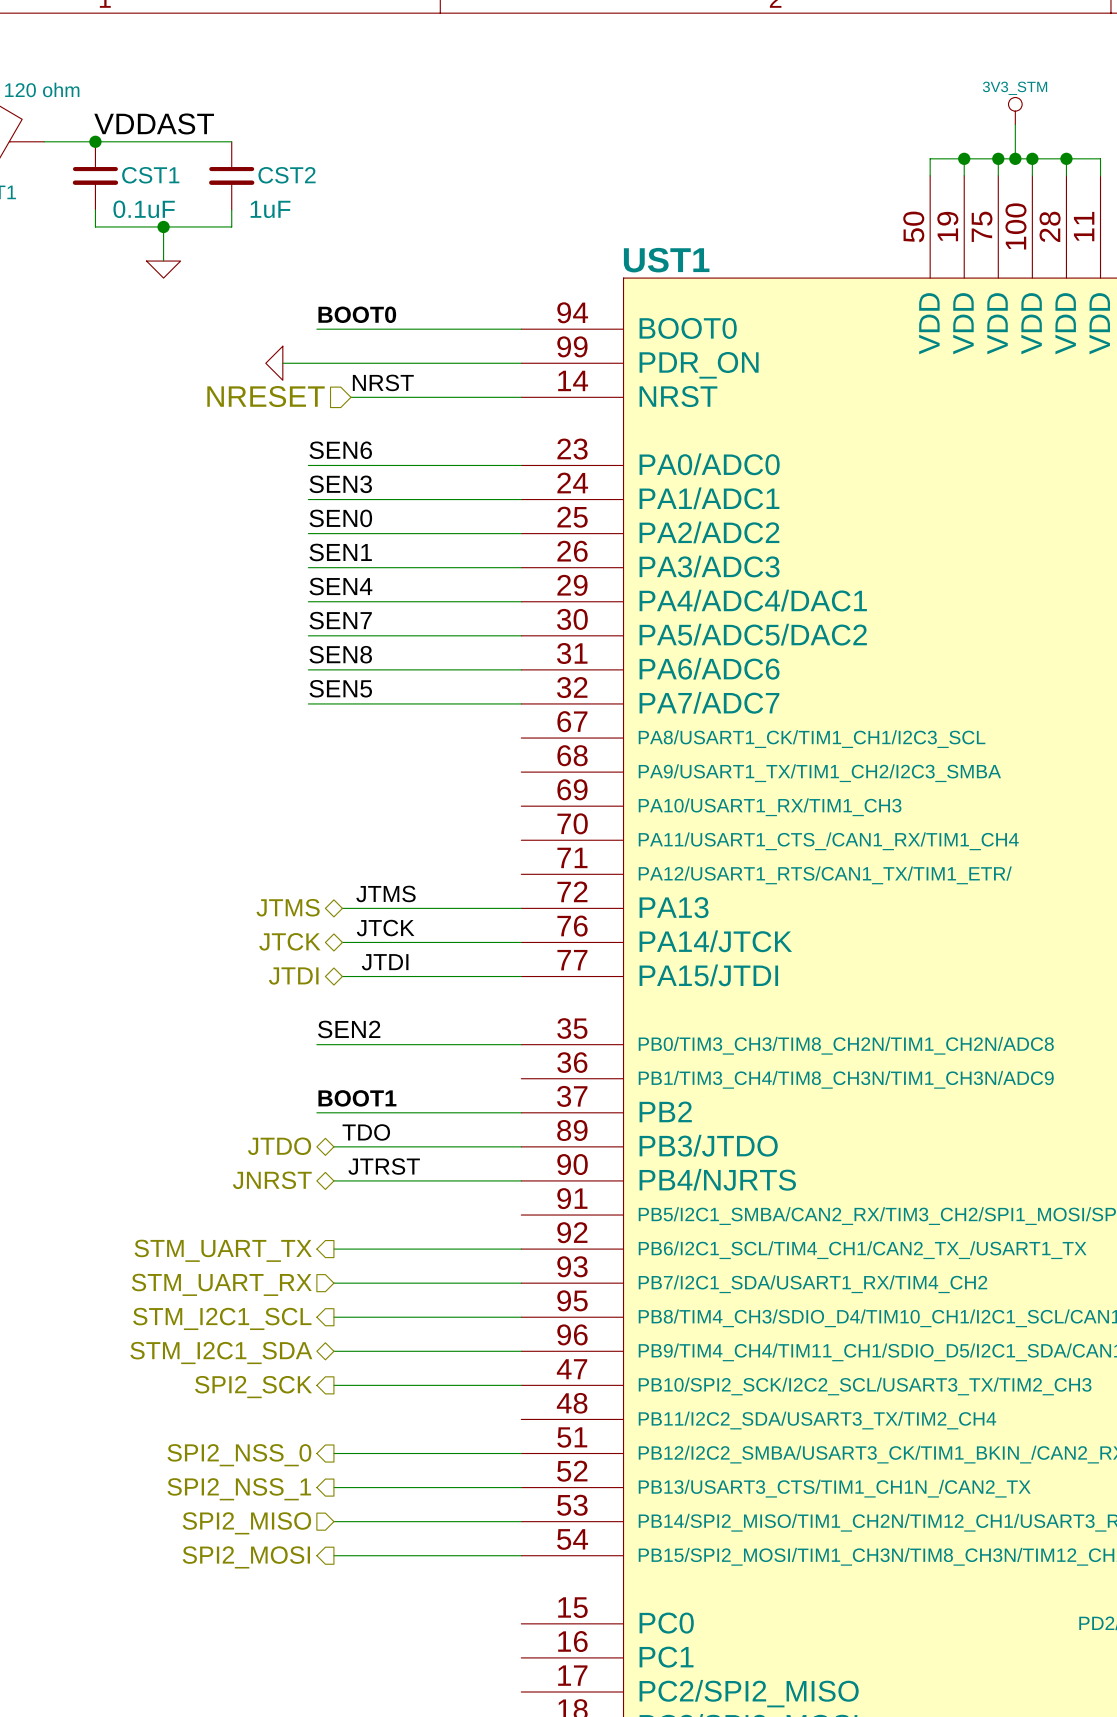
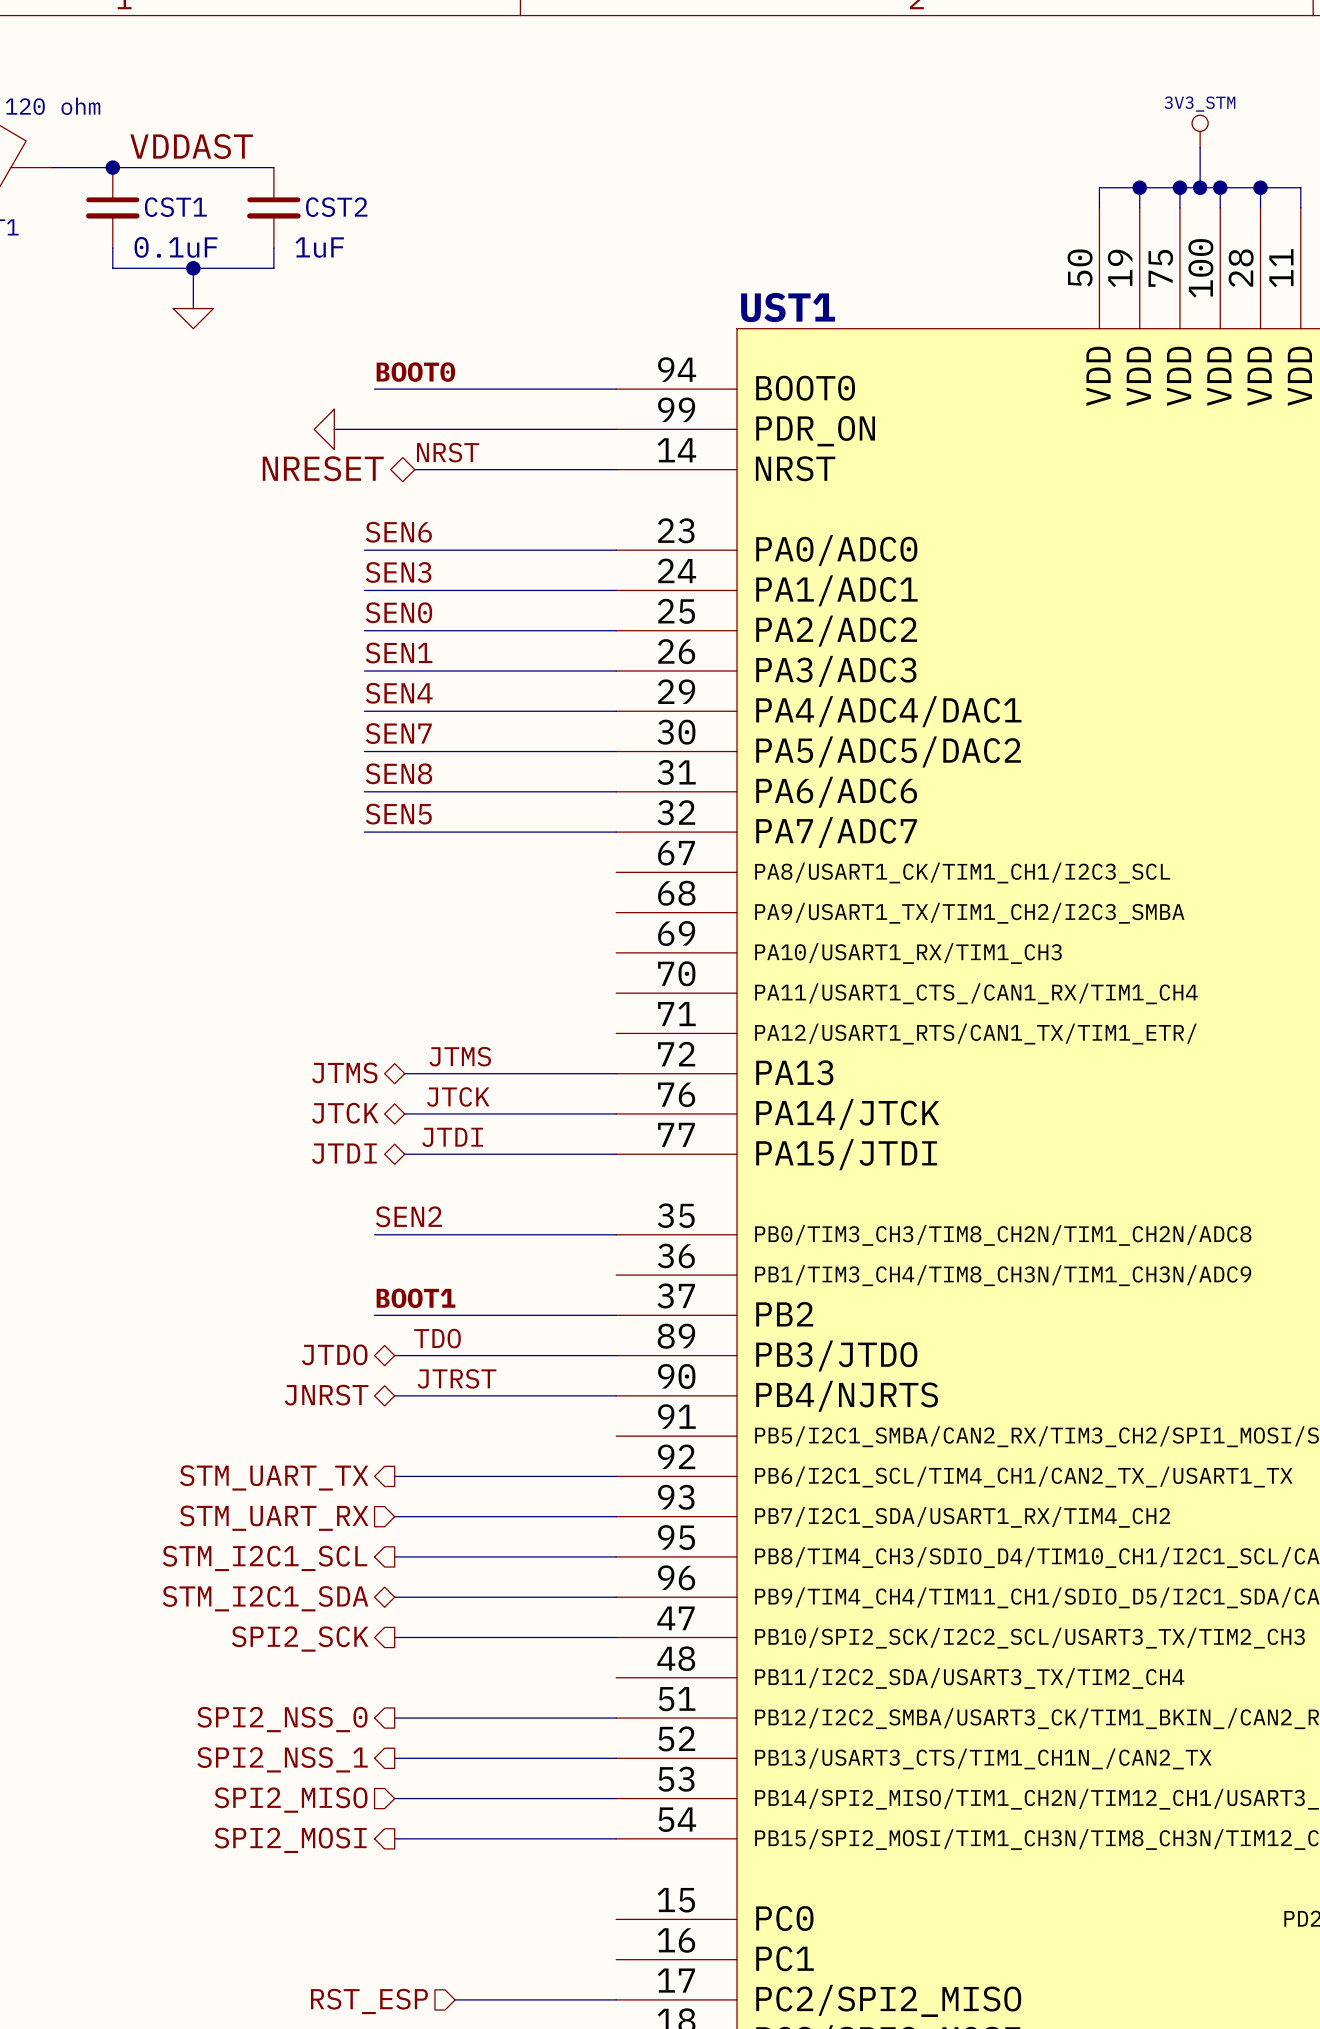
hierarchical label shape: input (266, 396) -> bidirectional (323, 468)
wire: none -> (455, 1999) (616, 1999)
hierarchical label: none -> RST_ESP (369, 2001)

